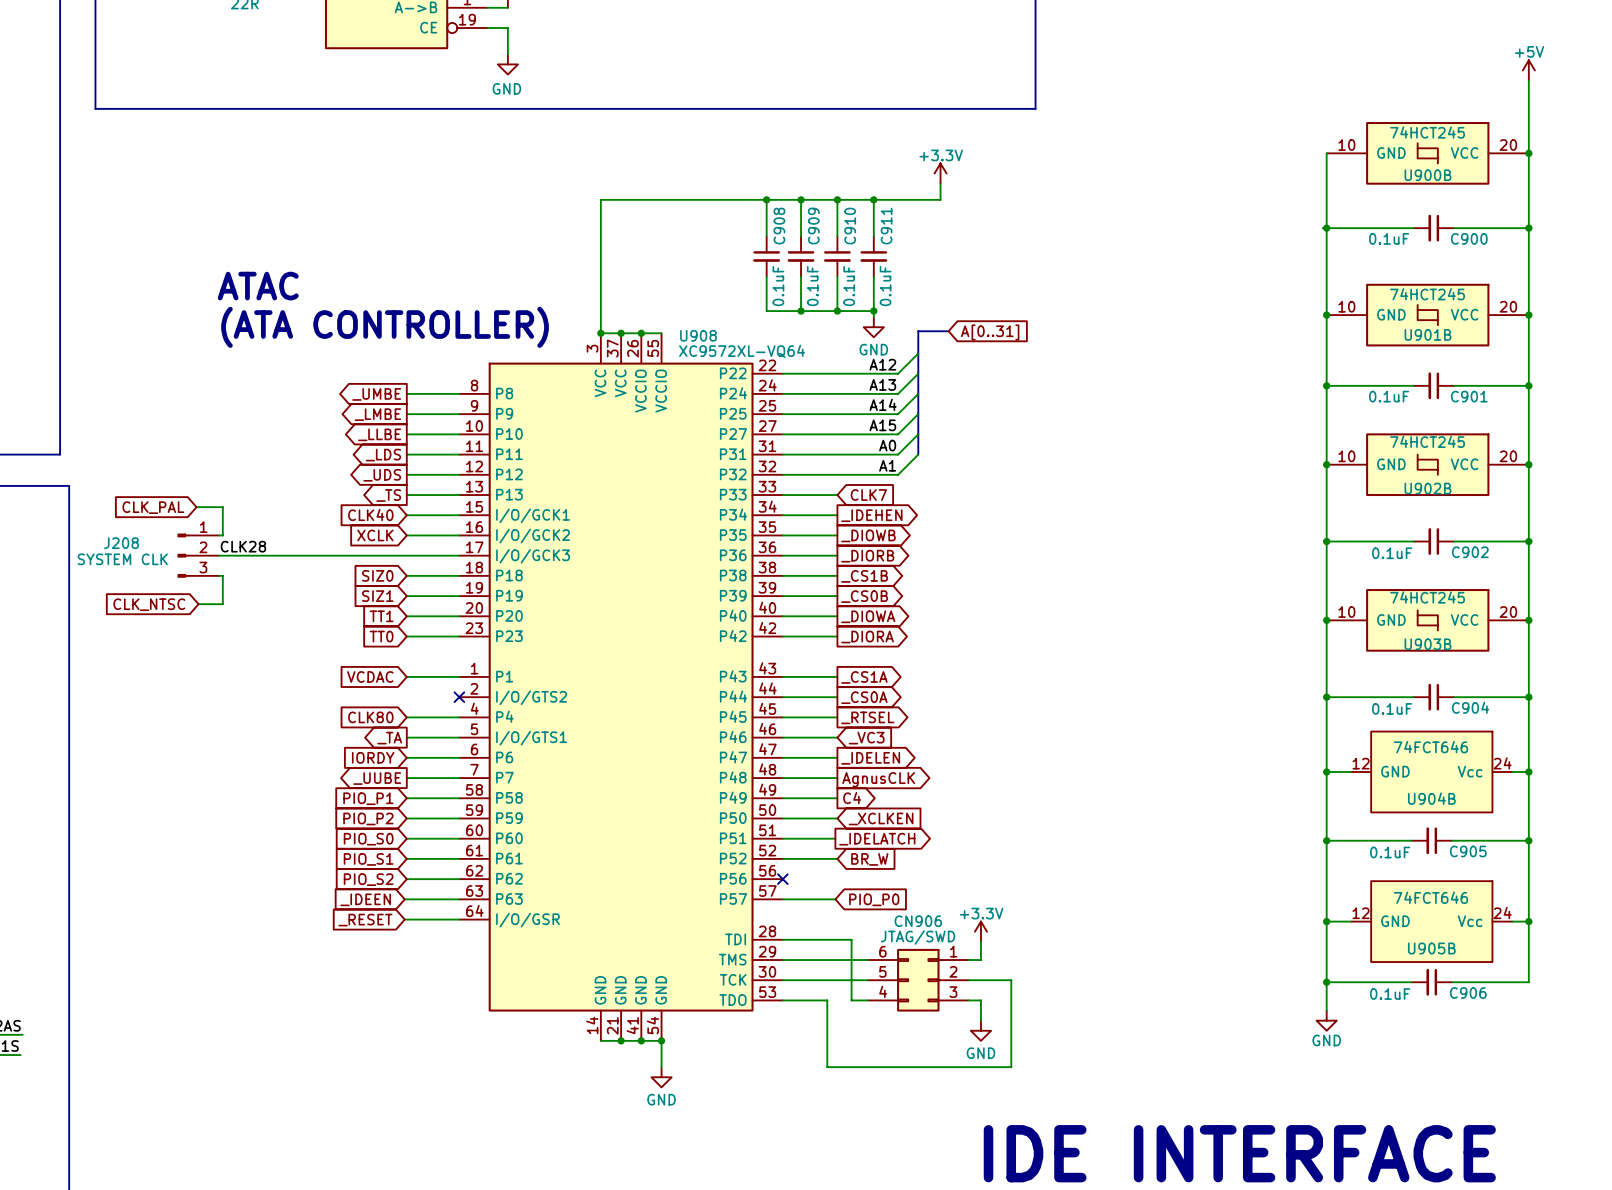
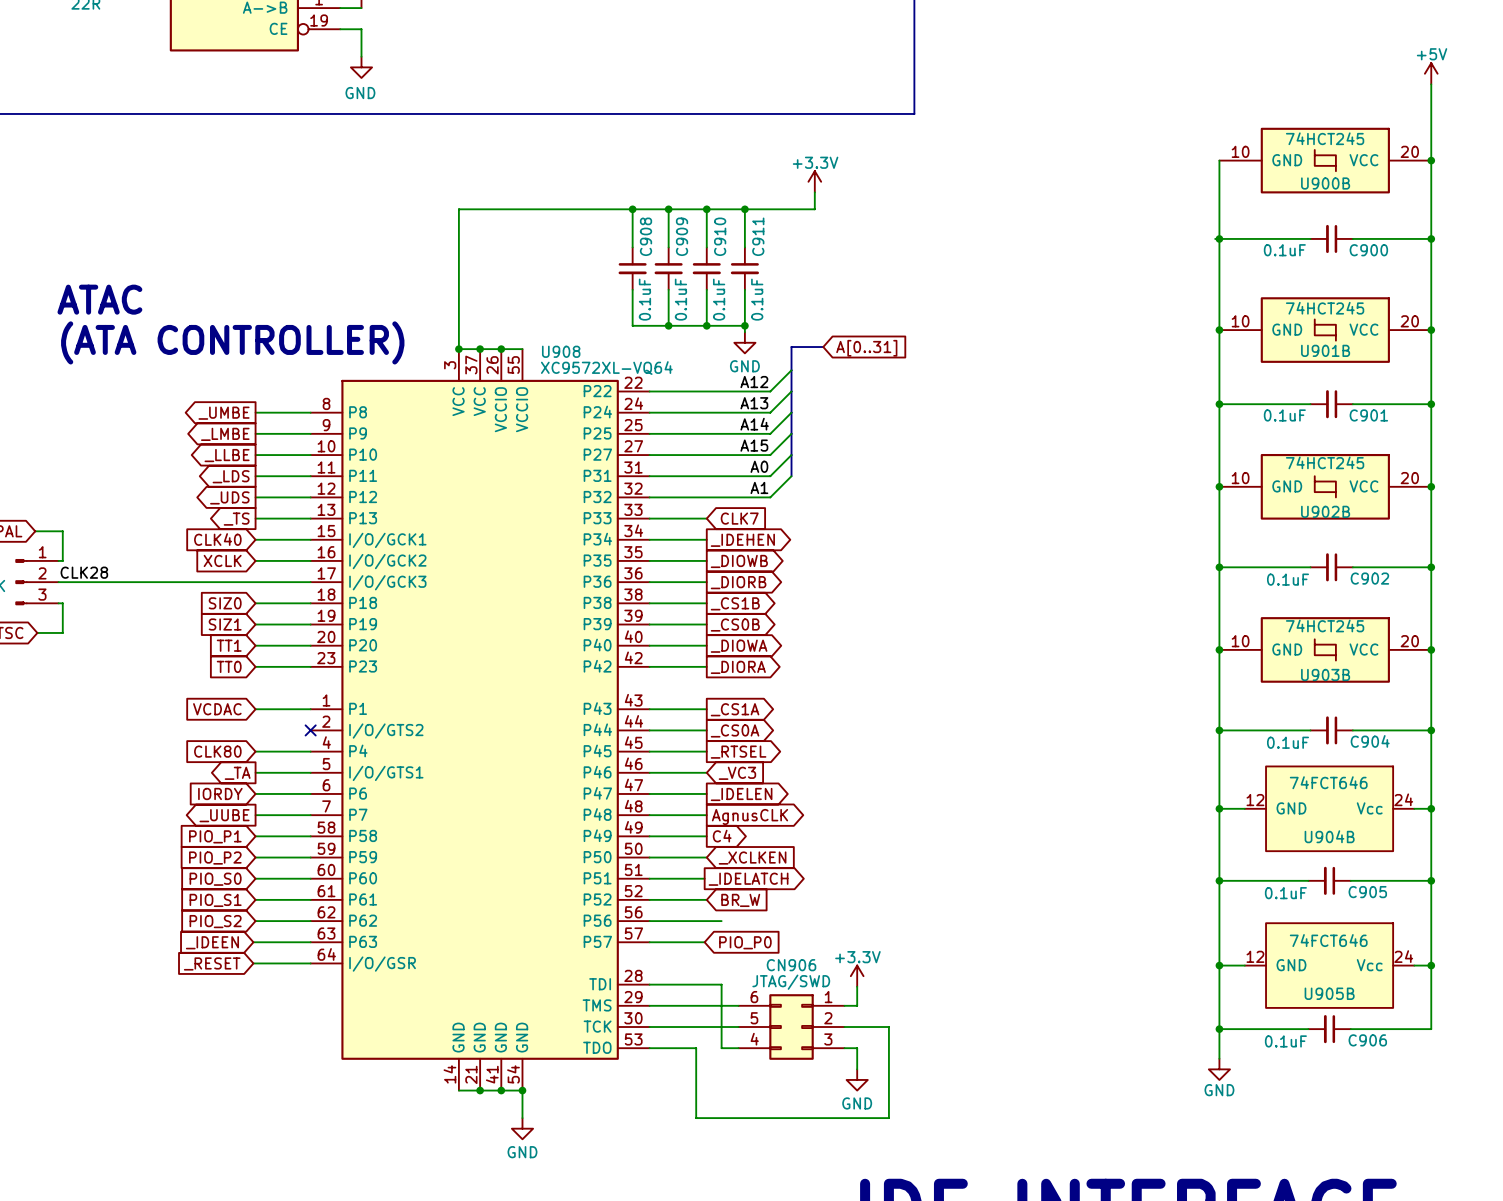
wire: none -> (649, 921) (721, 921)
no-connect mark: (782, 879) -> none

